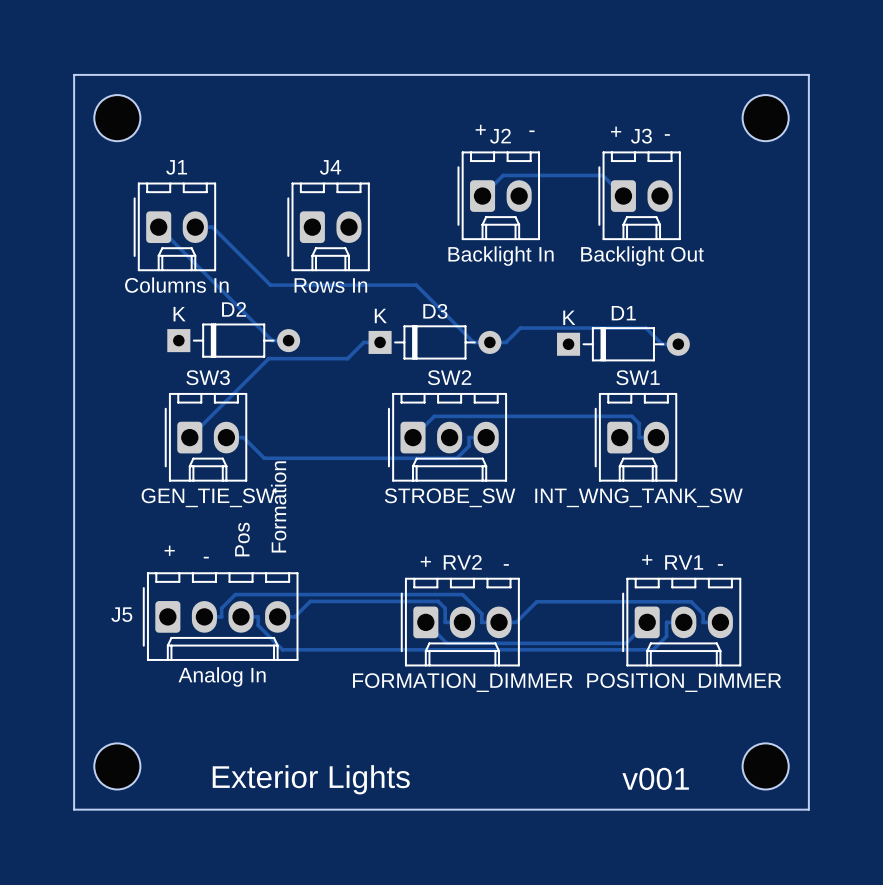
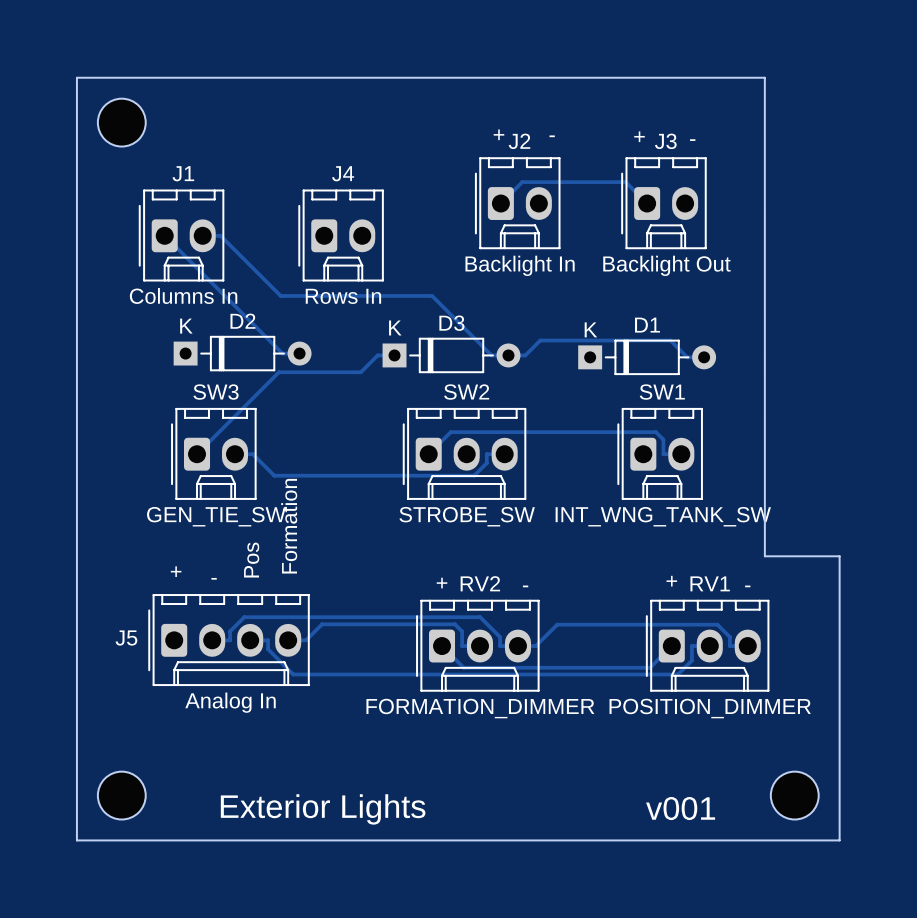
board edge: (736, 74) (808, 74) (808, 535) -> (764, 77) (764, 556) (839, 556)
part: (765, 118) -> none

